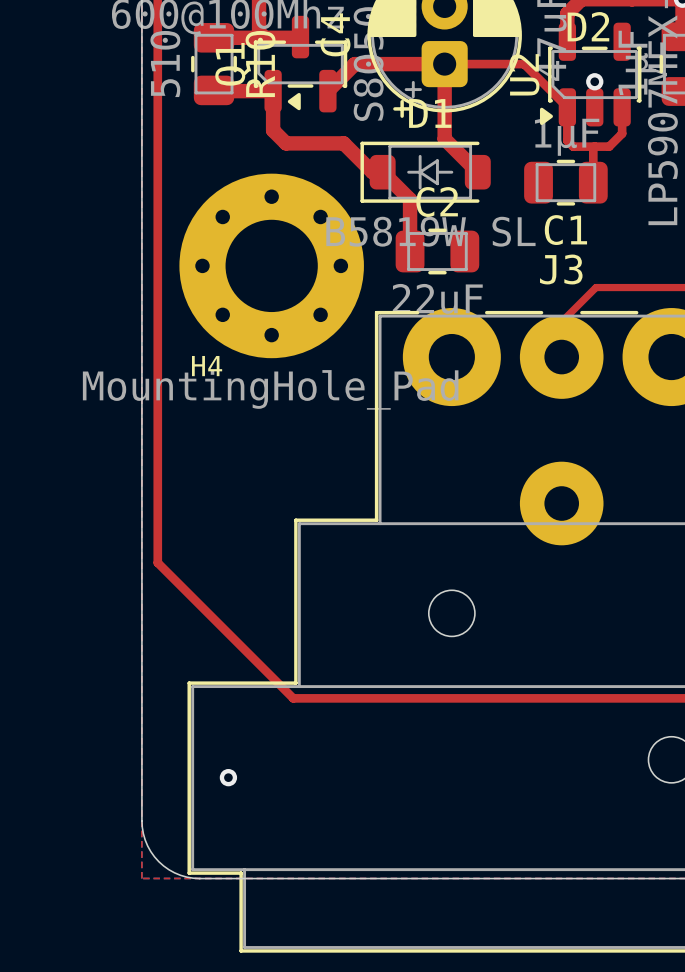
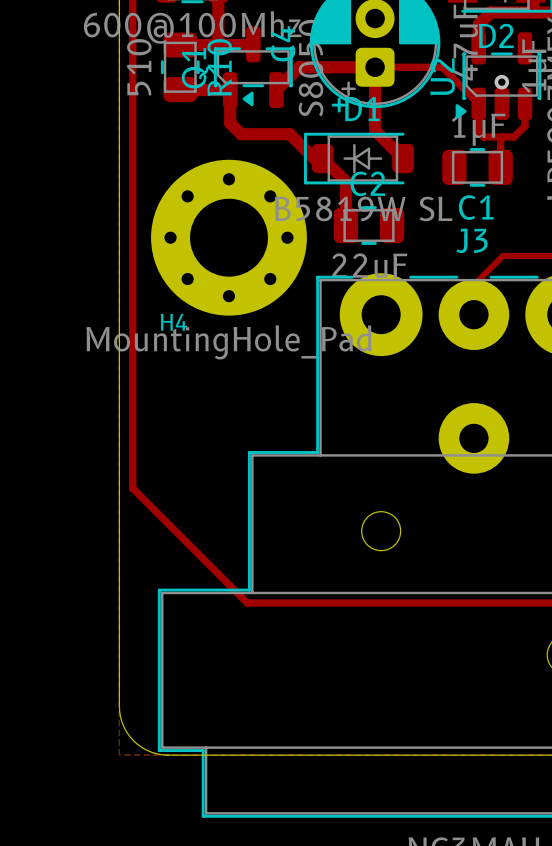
via: (228, 777) -> none

